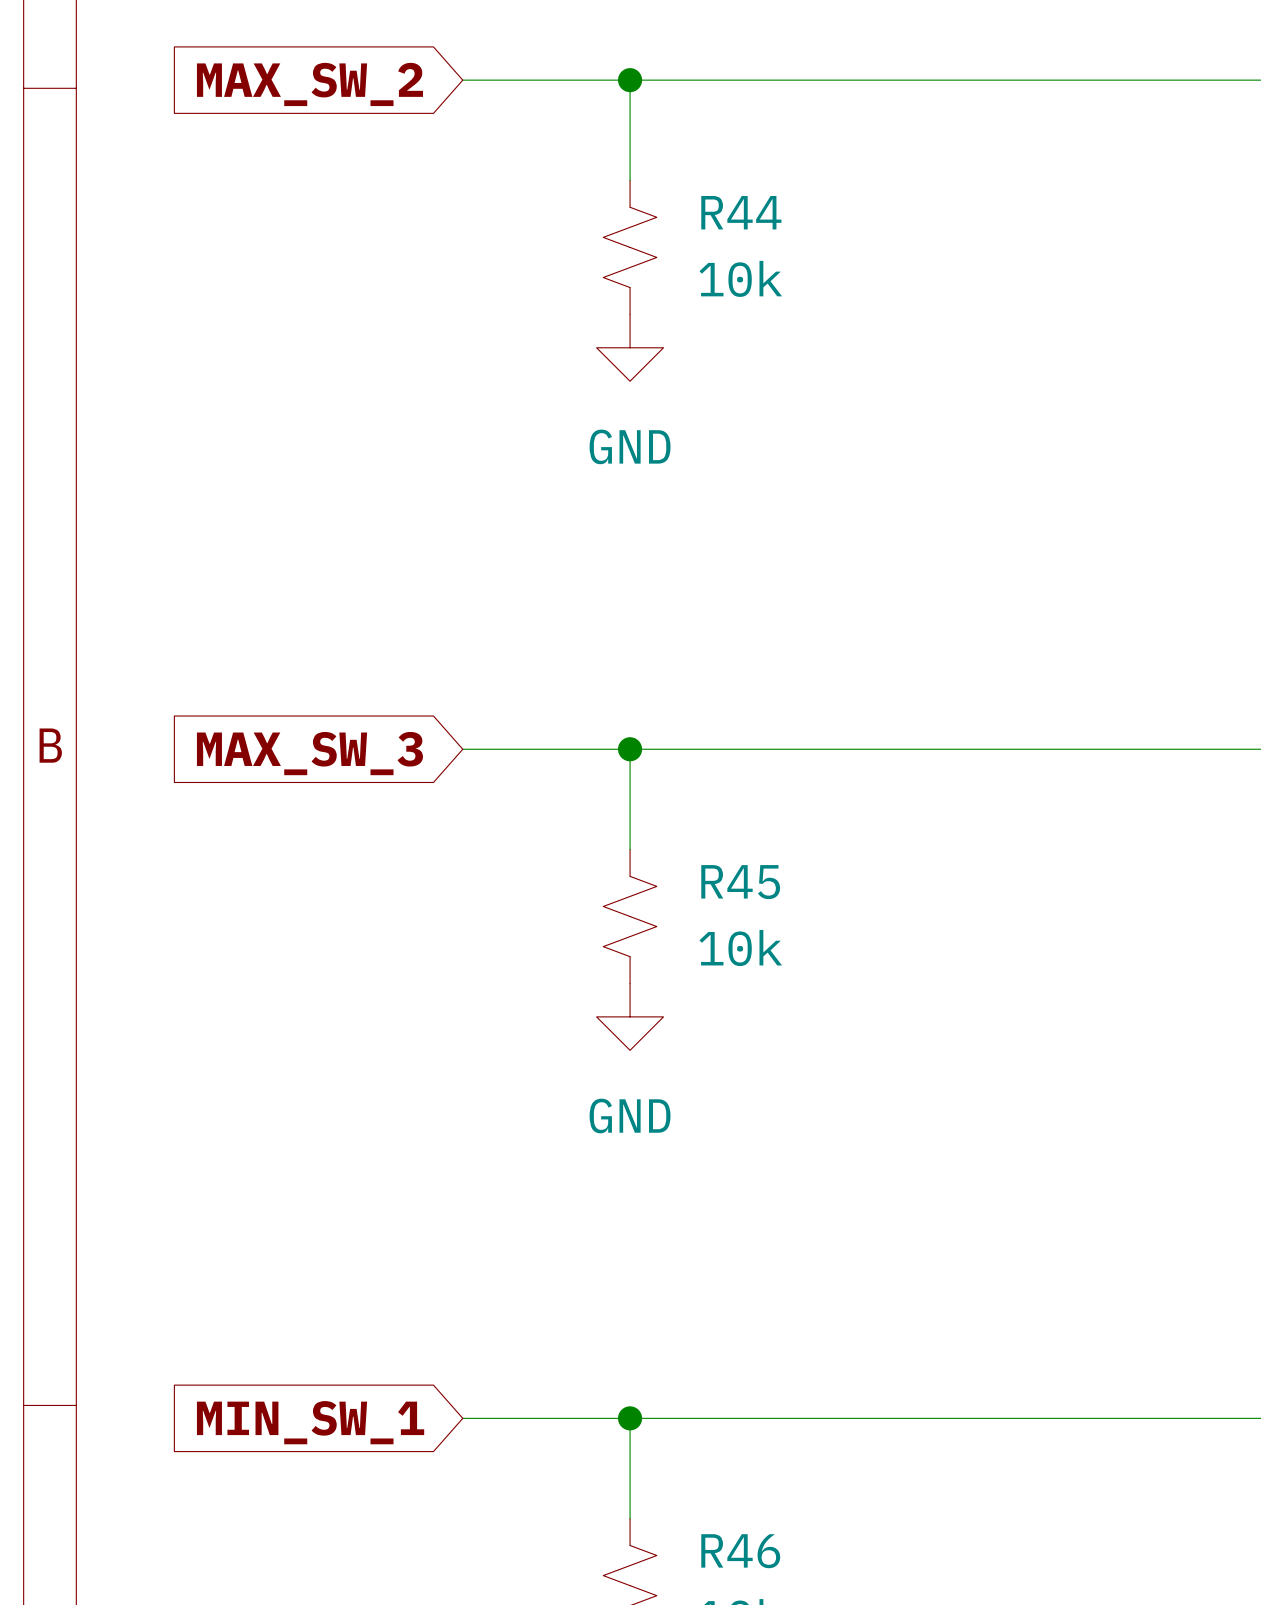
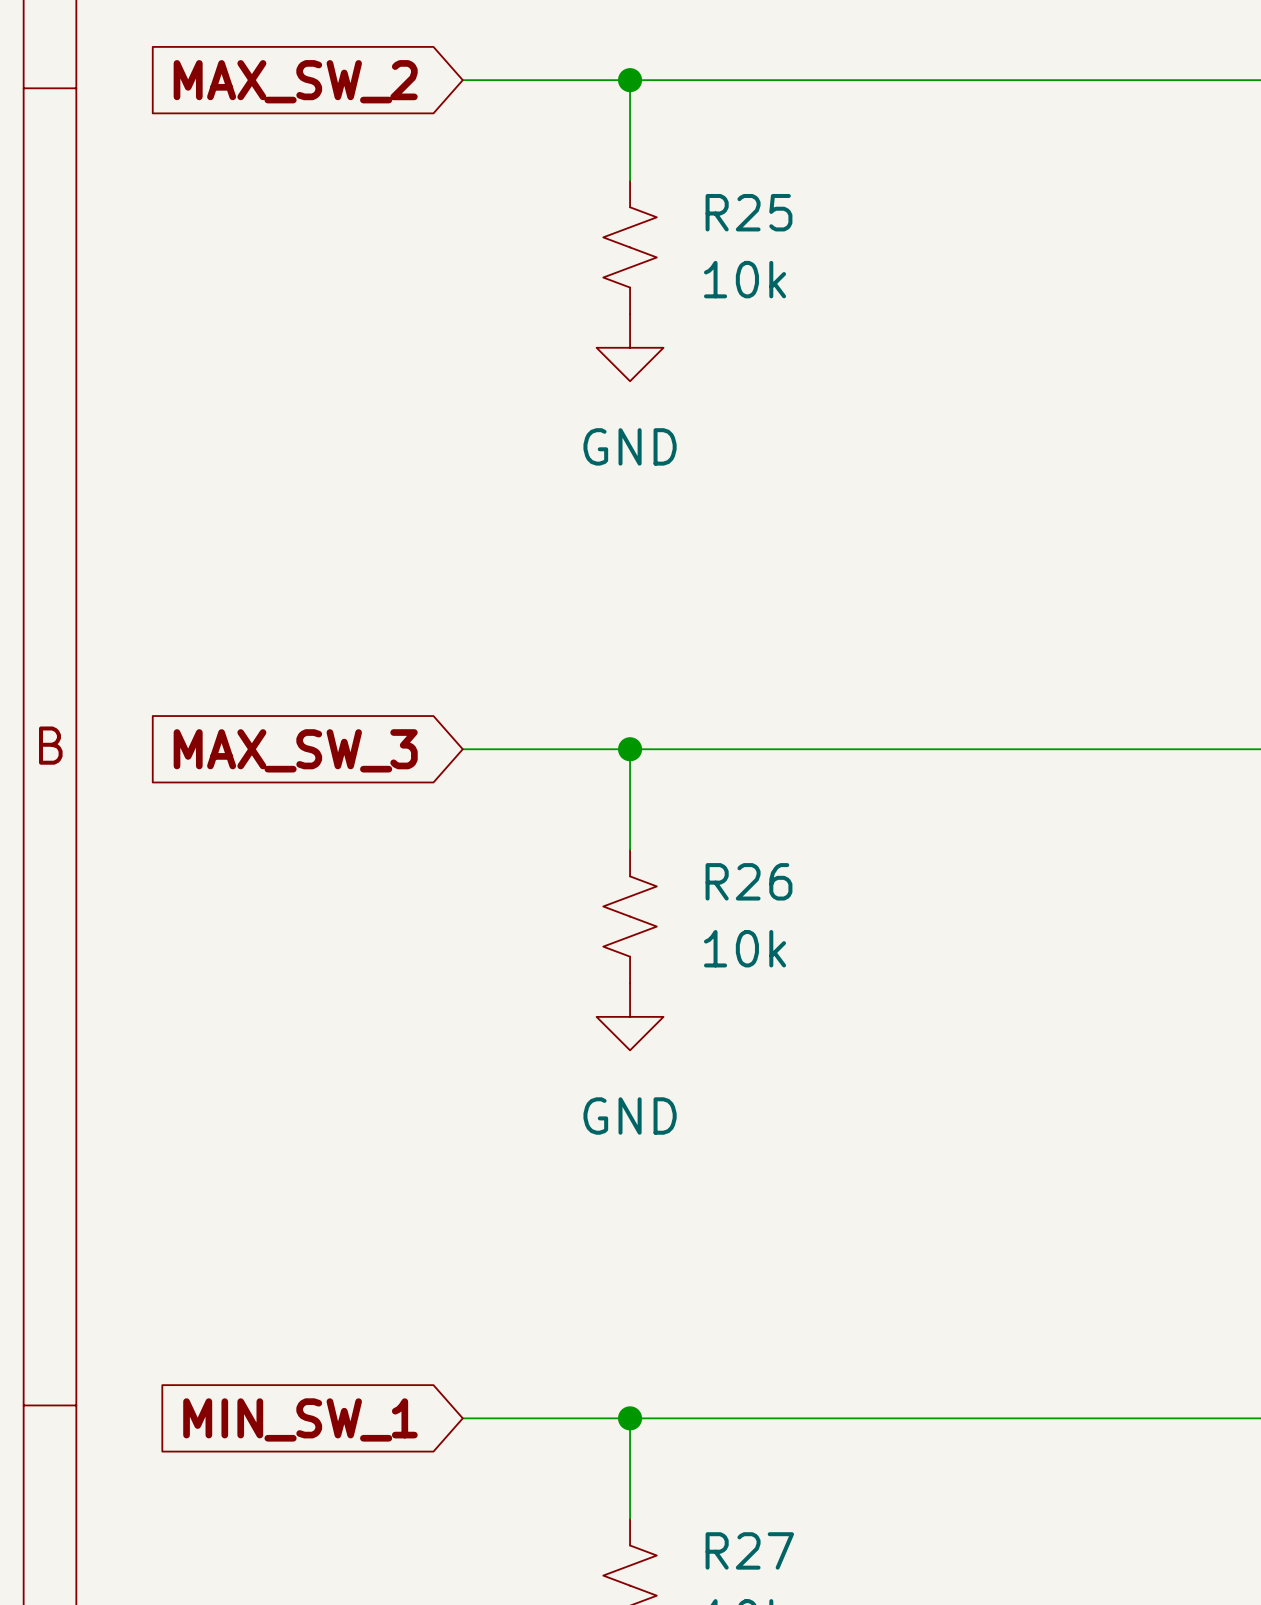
R44 name: R44 (741, 212) -> R25 (748, 212)
R45 name: R45 (740, 882) -> R26 (748, 881)
R46 name: R46 (740, 1551) -> R27 (749, 1550)

